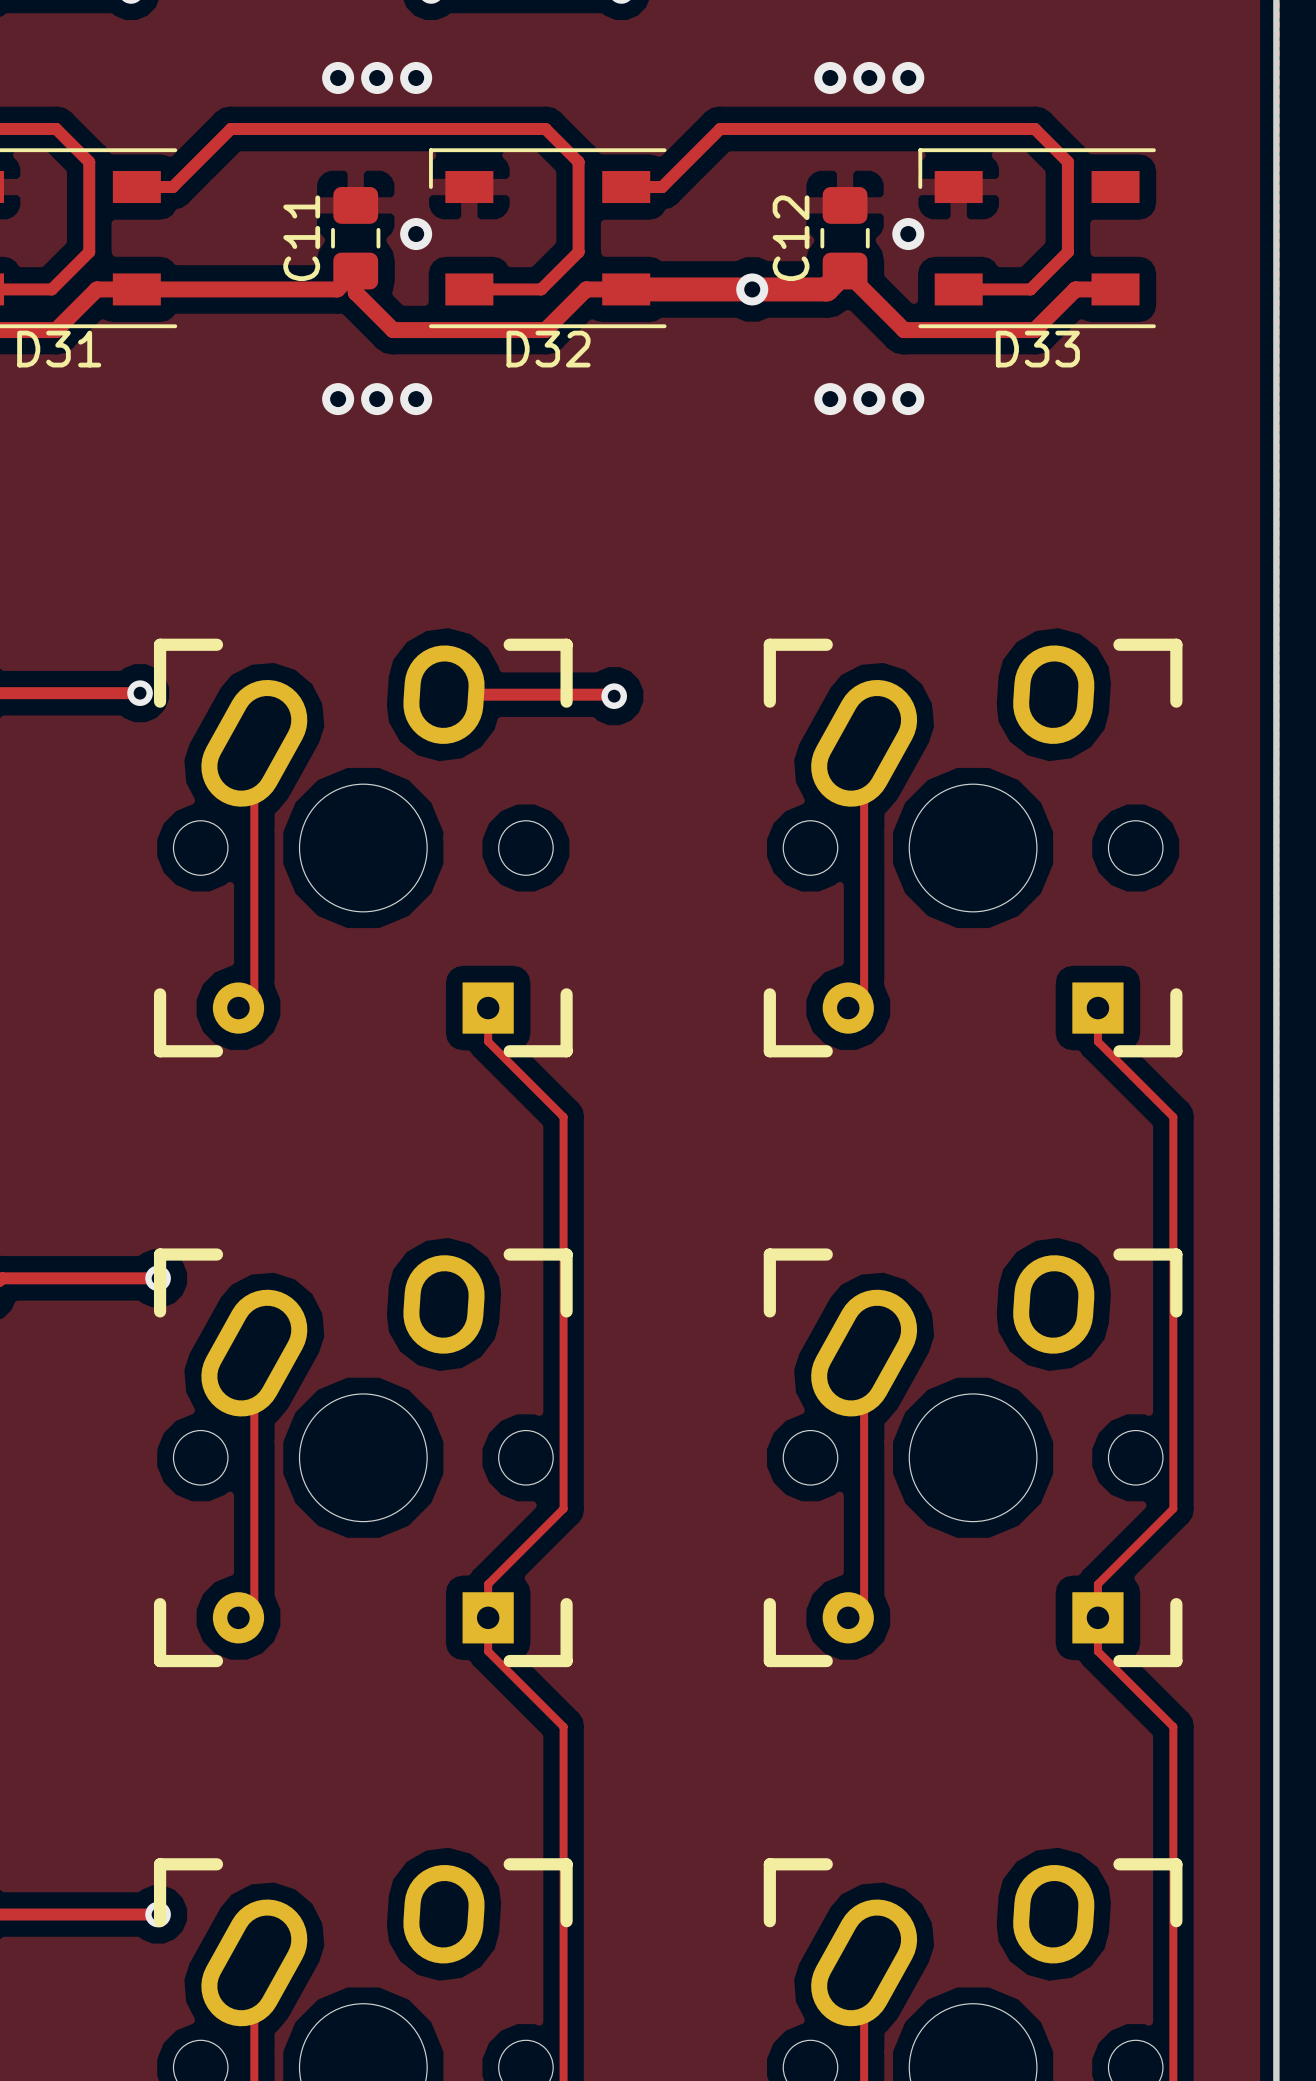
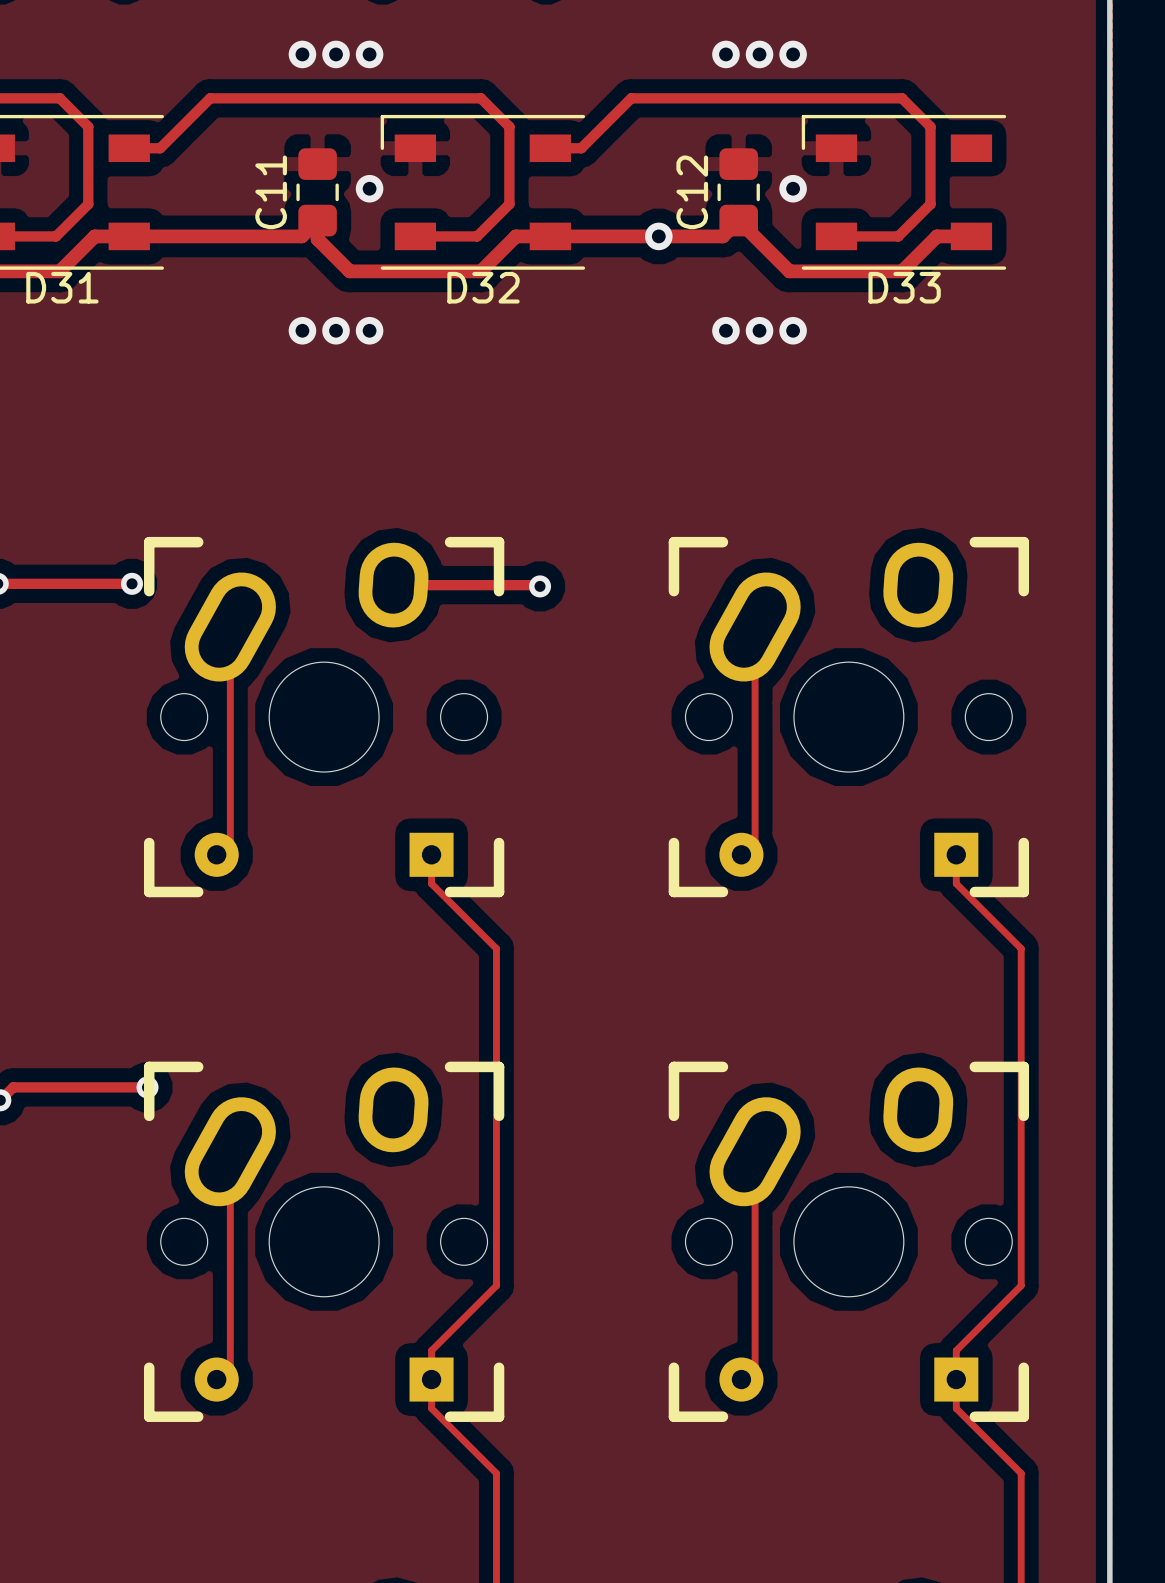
track width: thick (845, 271) (826, 289) (626, 289) -> thin (738, 220) (722, 236) (550, 236)

